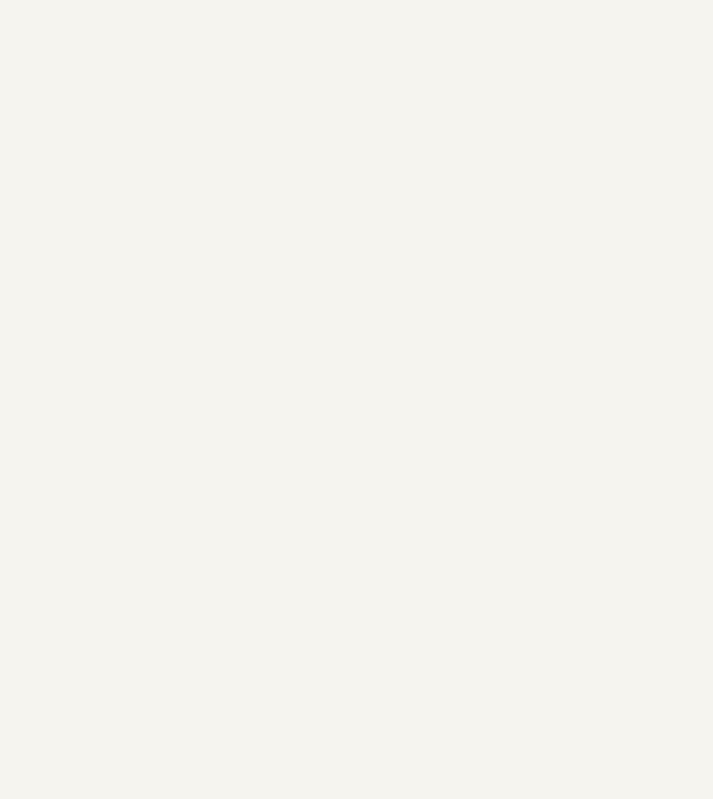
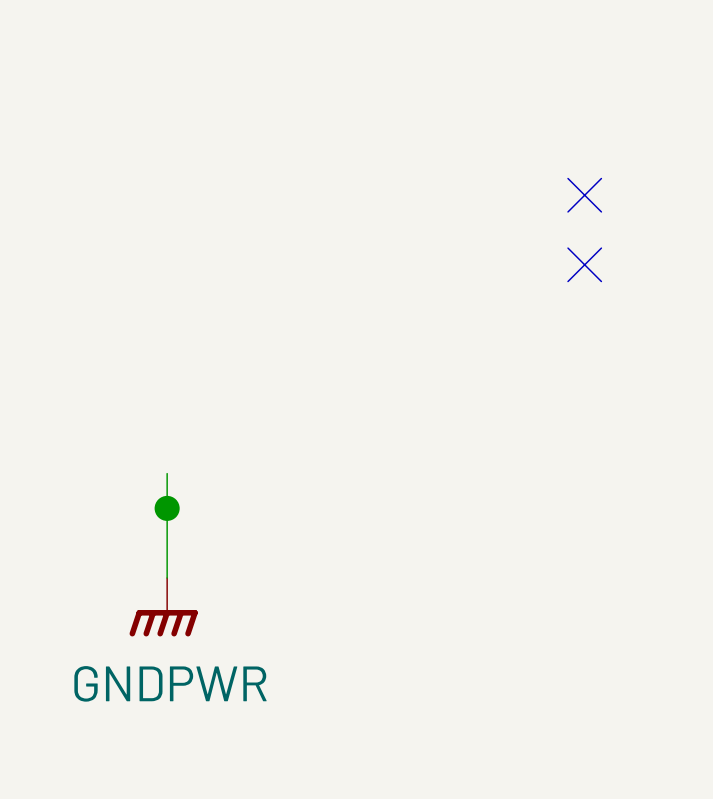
no-connect mark: none -> (584, 195)
no-connect mark: none -> (584, 264)
wire: none -> (167, 473) (167, 577)
junction: none -> (167, 508)
power symbol: none -> GNDPWR (163, 607)

